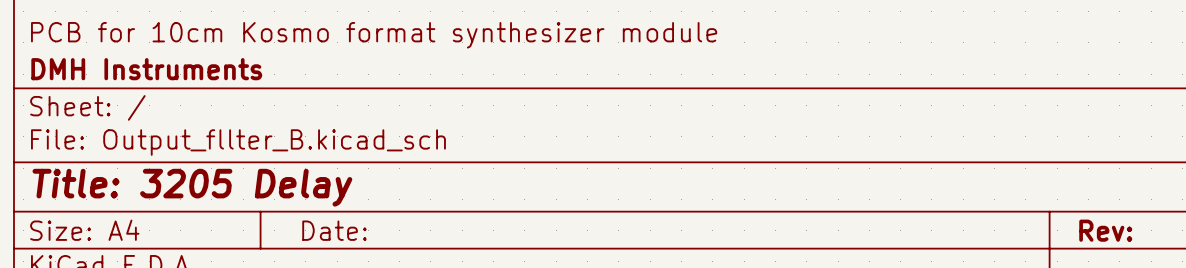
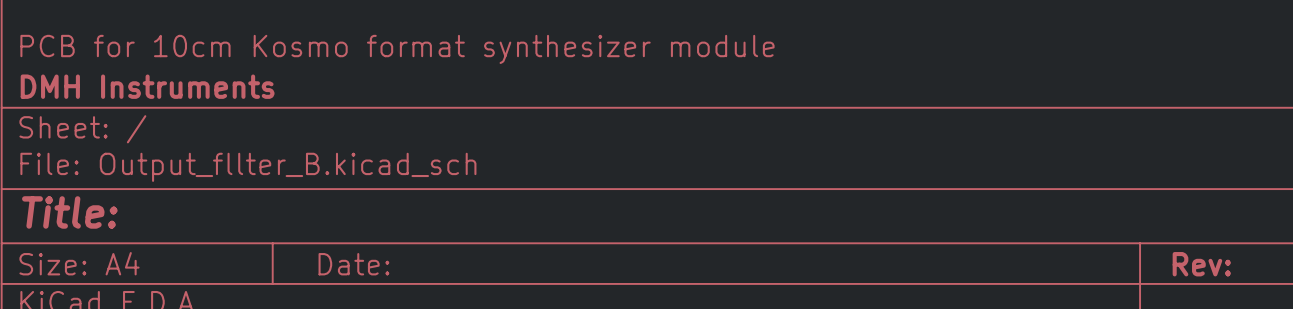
title block: Title: 3205 Delay (192, 187) -> Title: (69, 212)

